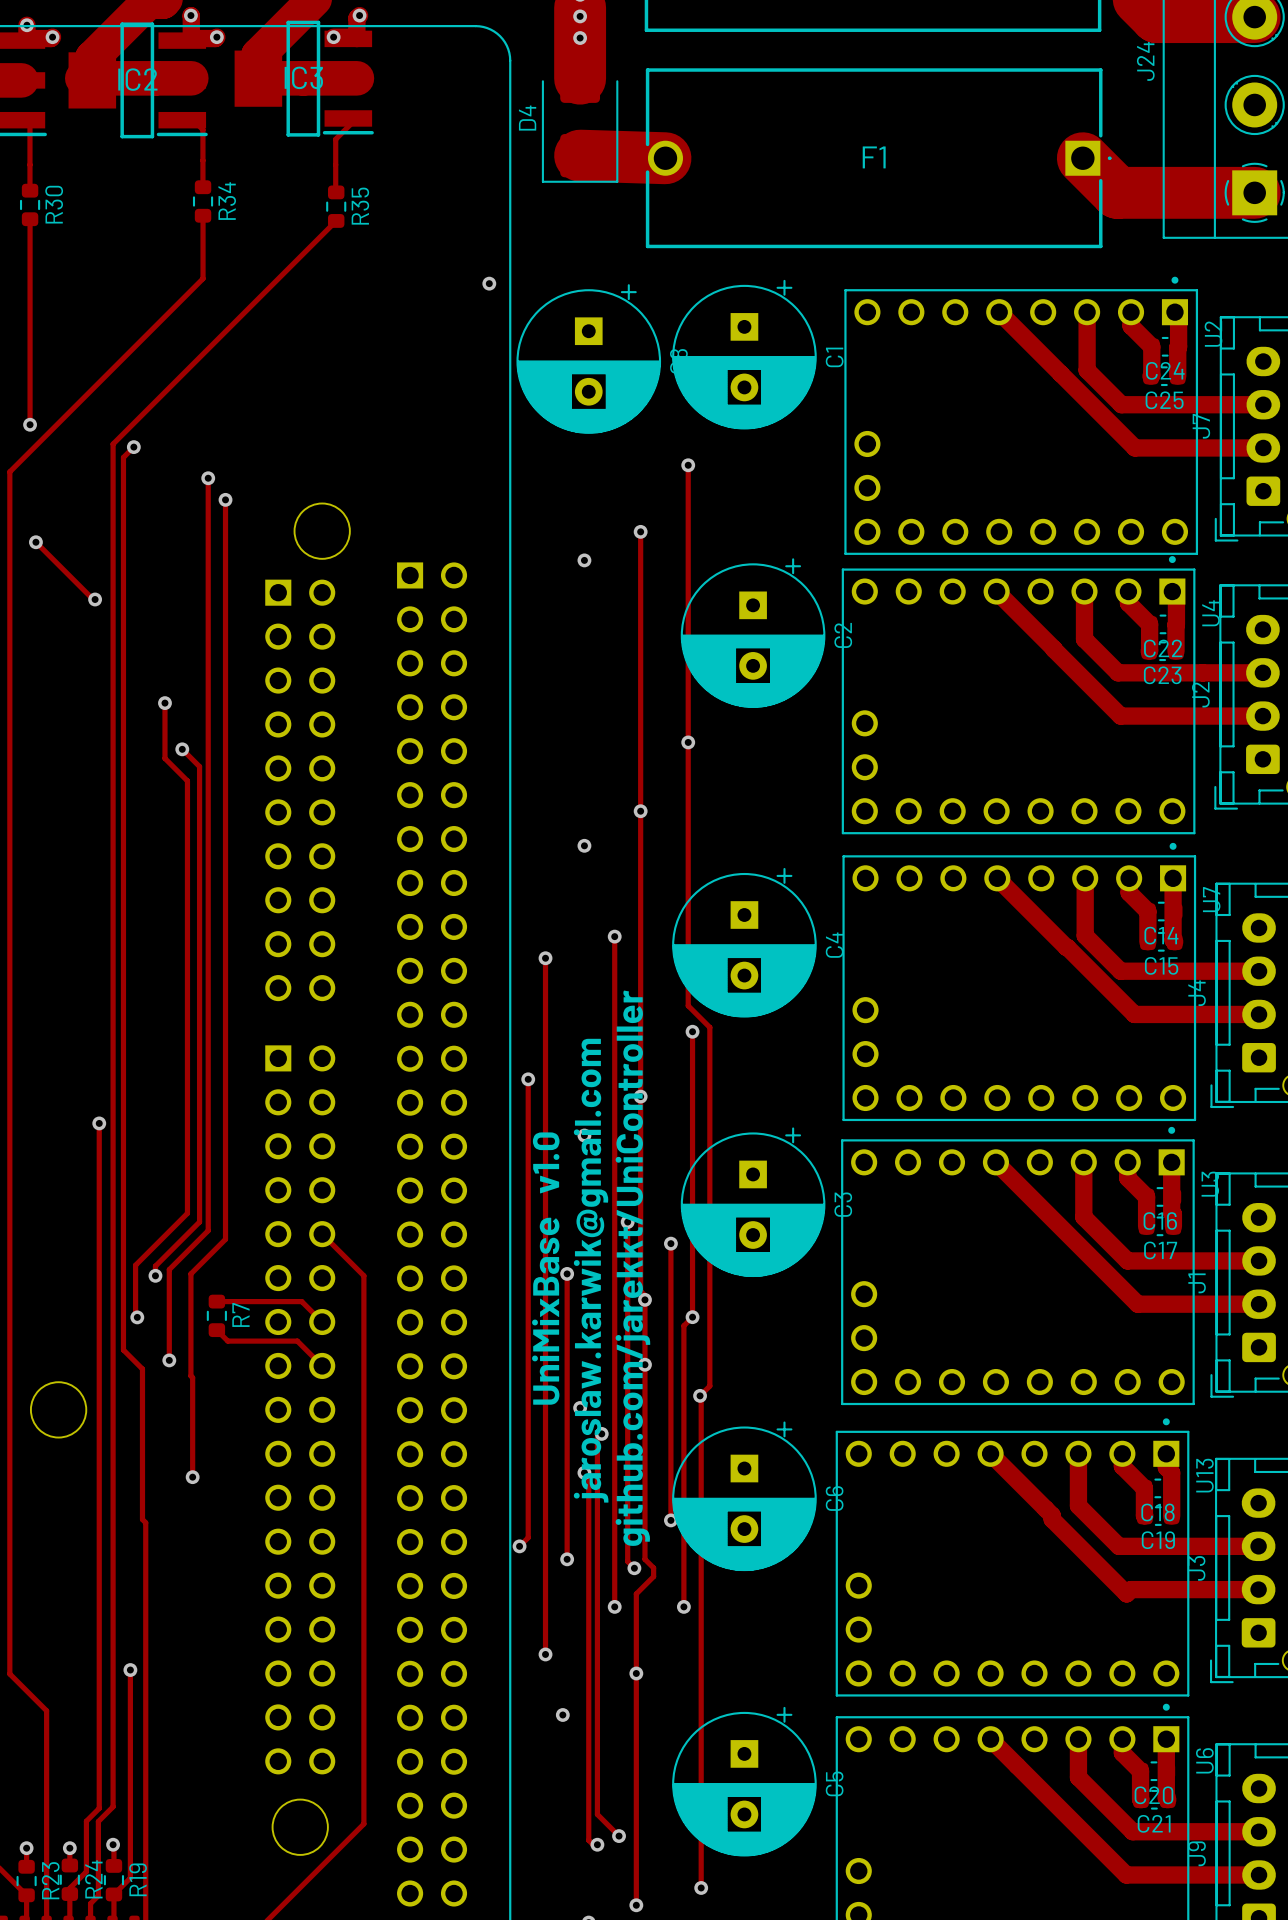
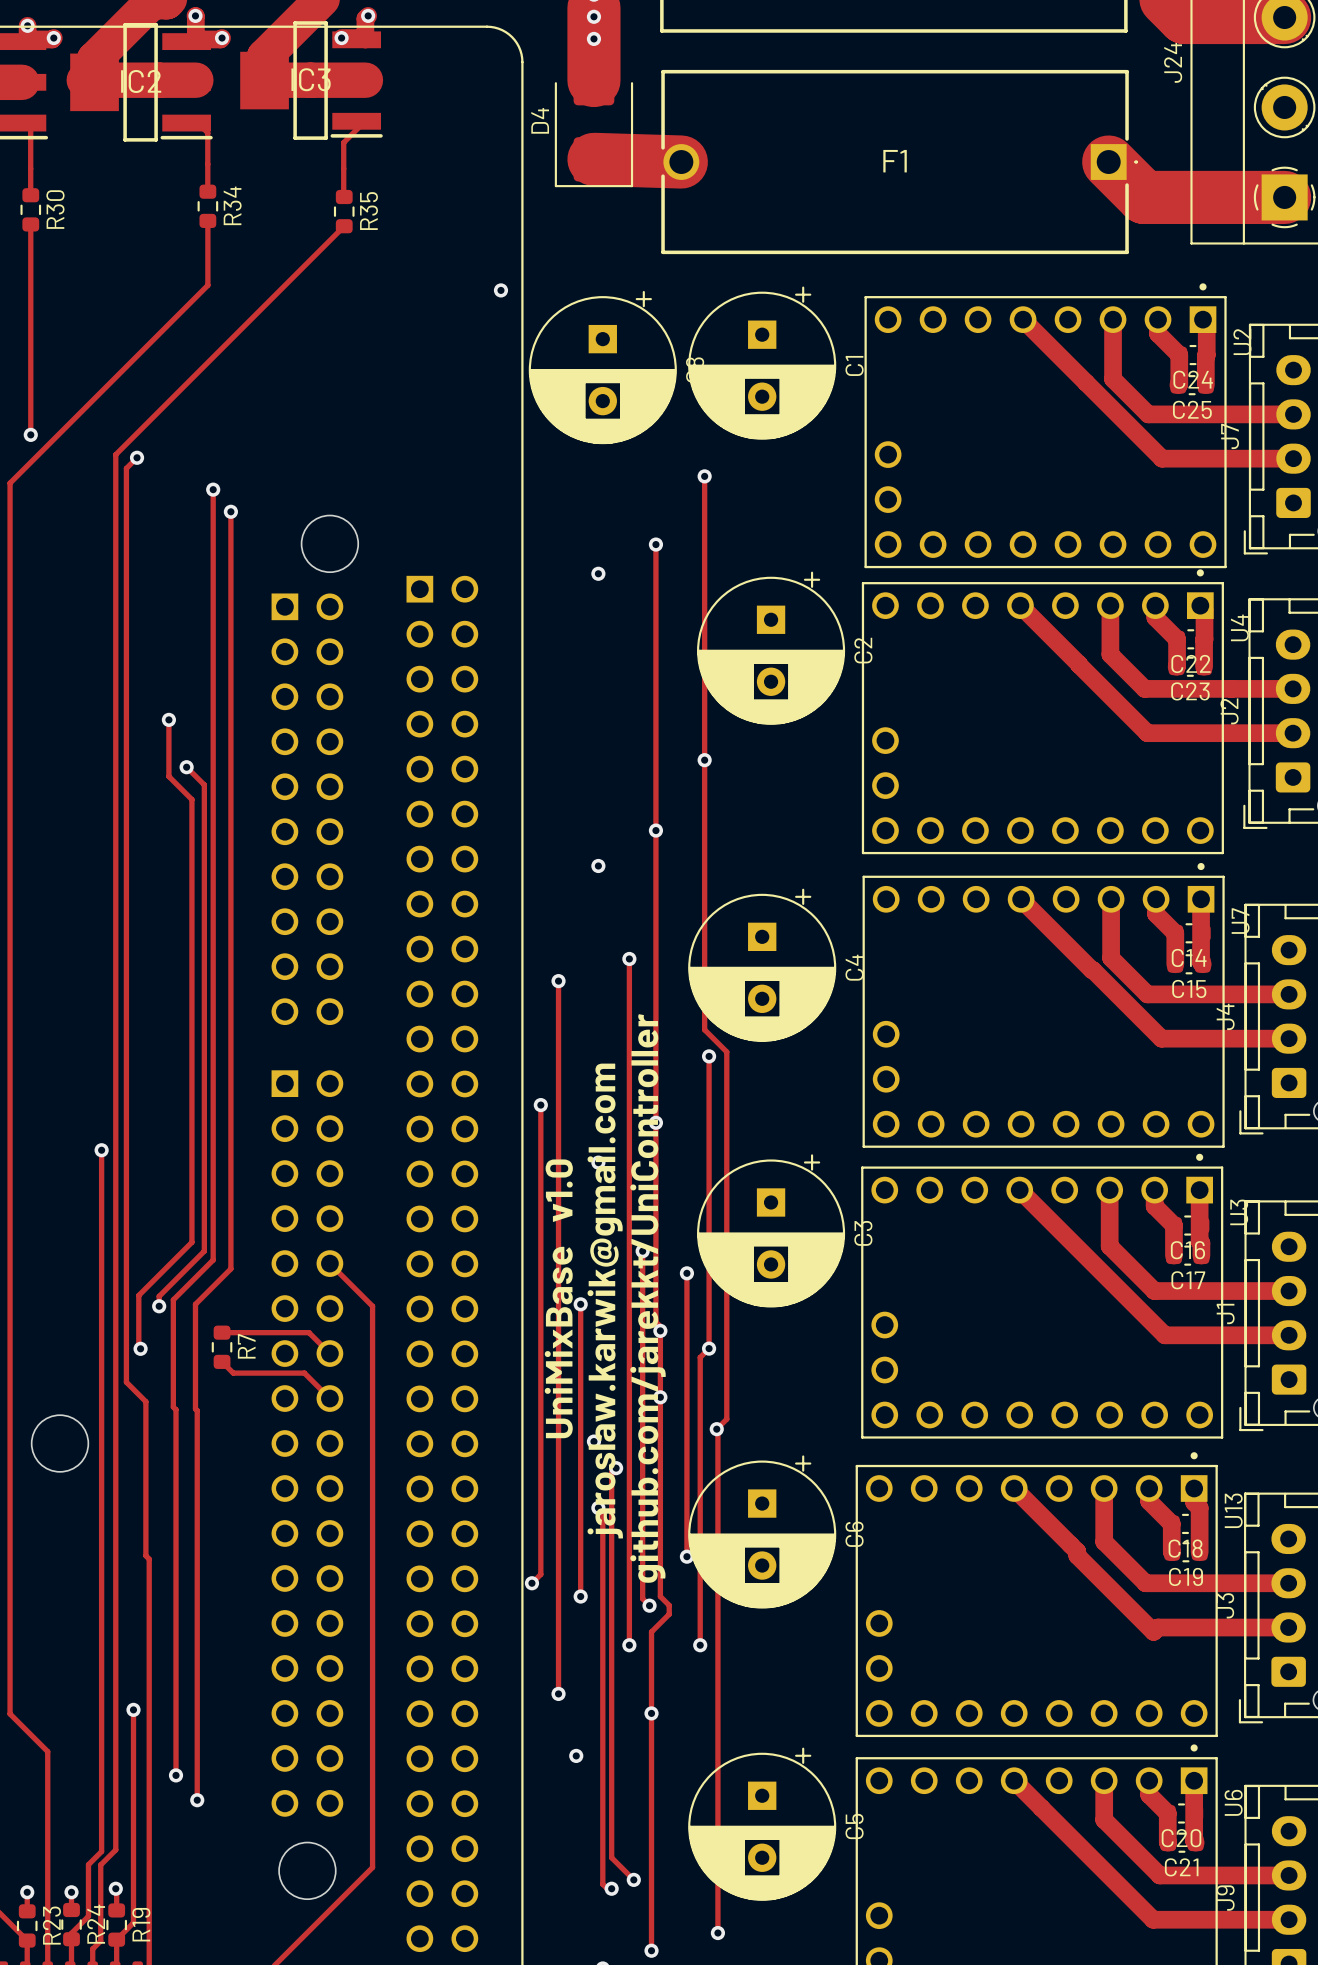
track: (35, 542) (95, 599) -> none
via: (35, 542) -> none
via: (95, 599) -> none
track: none -> (173, 1392) (173, 1407) (176, 1409) (176, 1775)
via: (169, 1360) -> none
track: none -> (197, 1512) (197, 1800)
via: (192, 1477) -> none
via: none -> (176, 1775)
via: none -> (197, 1800)

